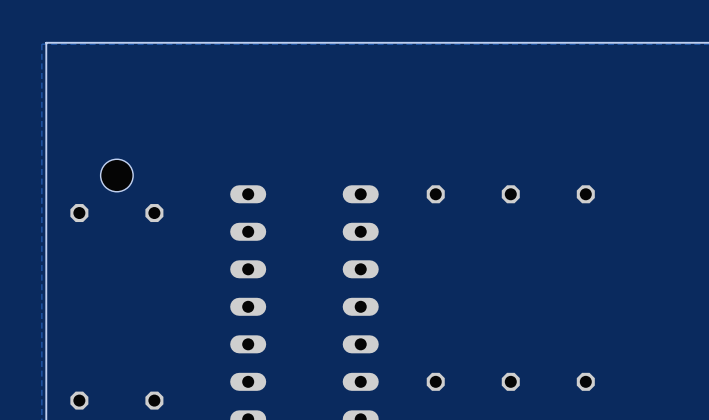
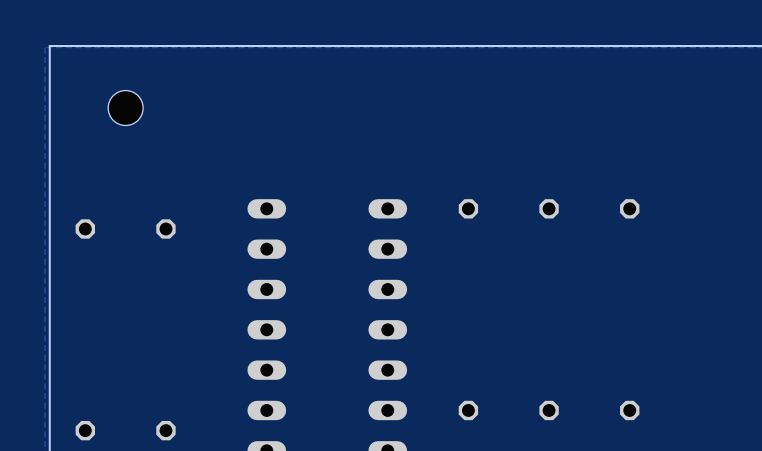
hole position: (116, 175) -> (125, 108)

